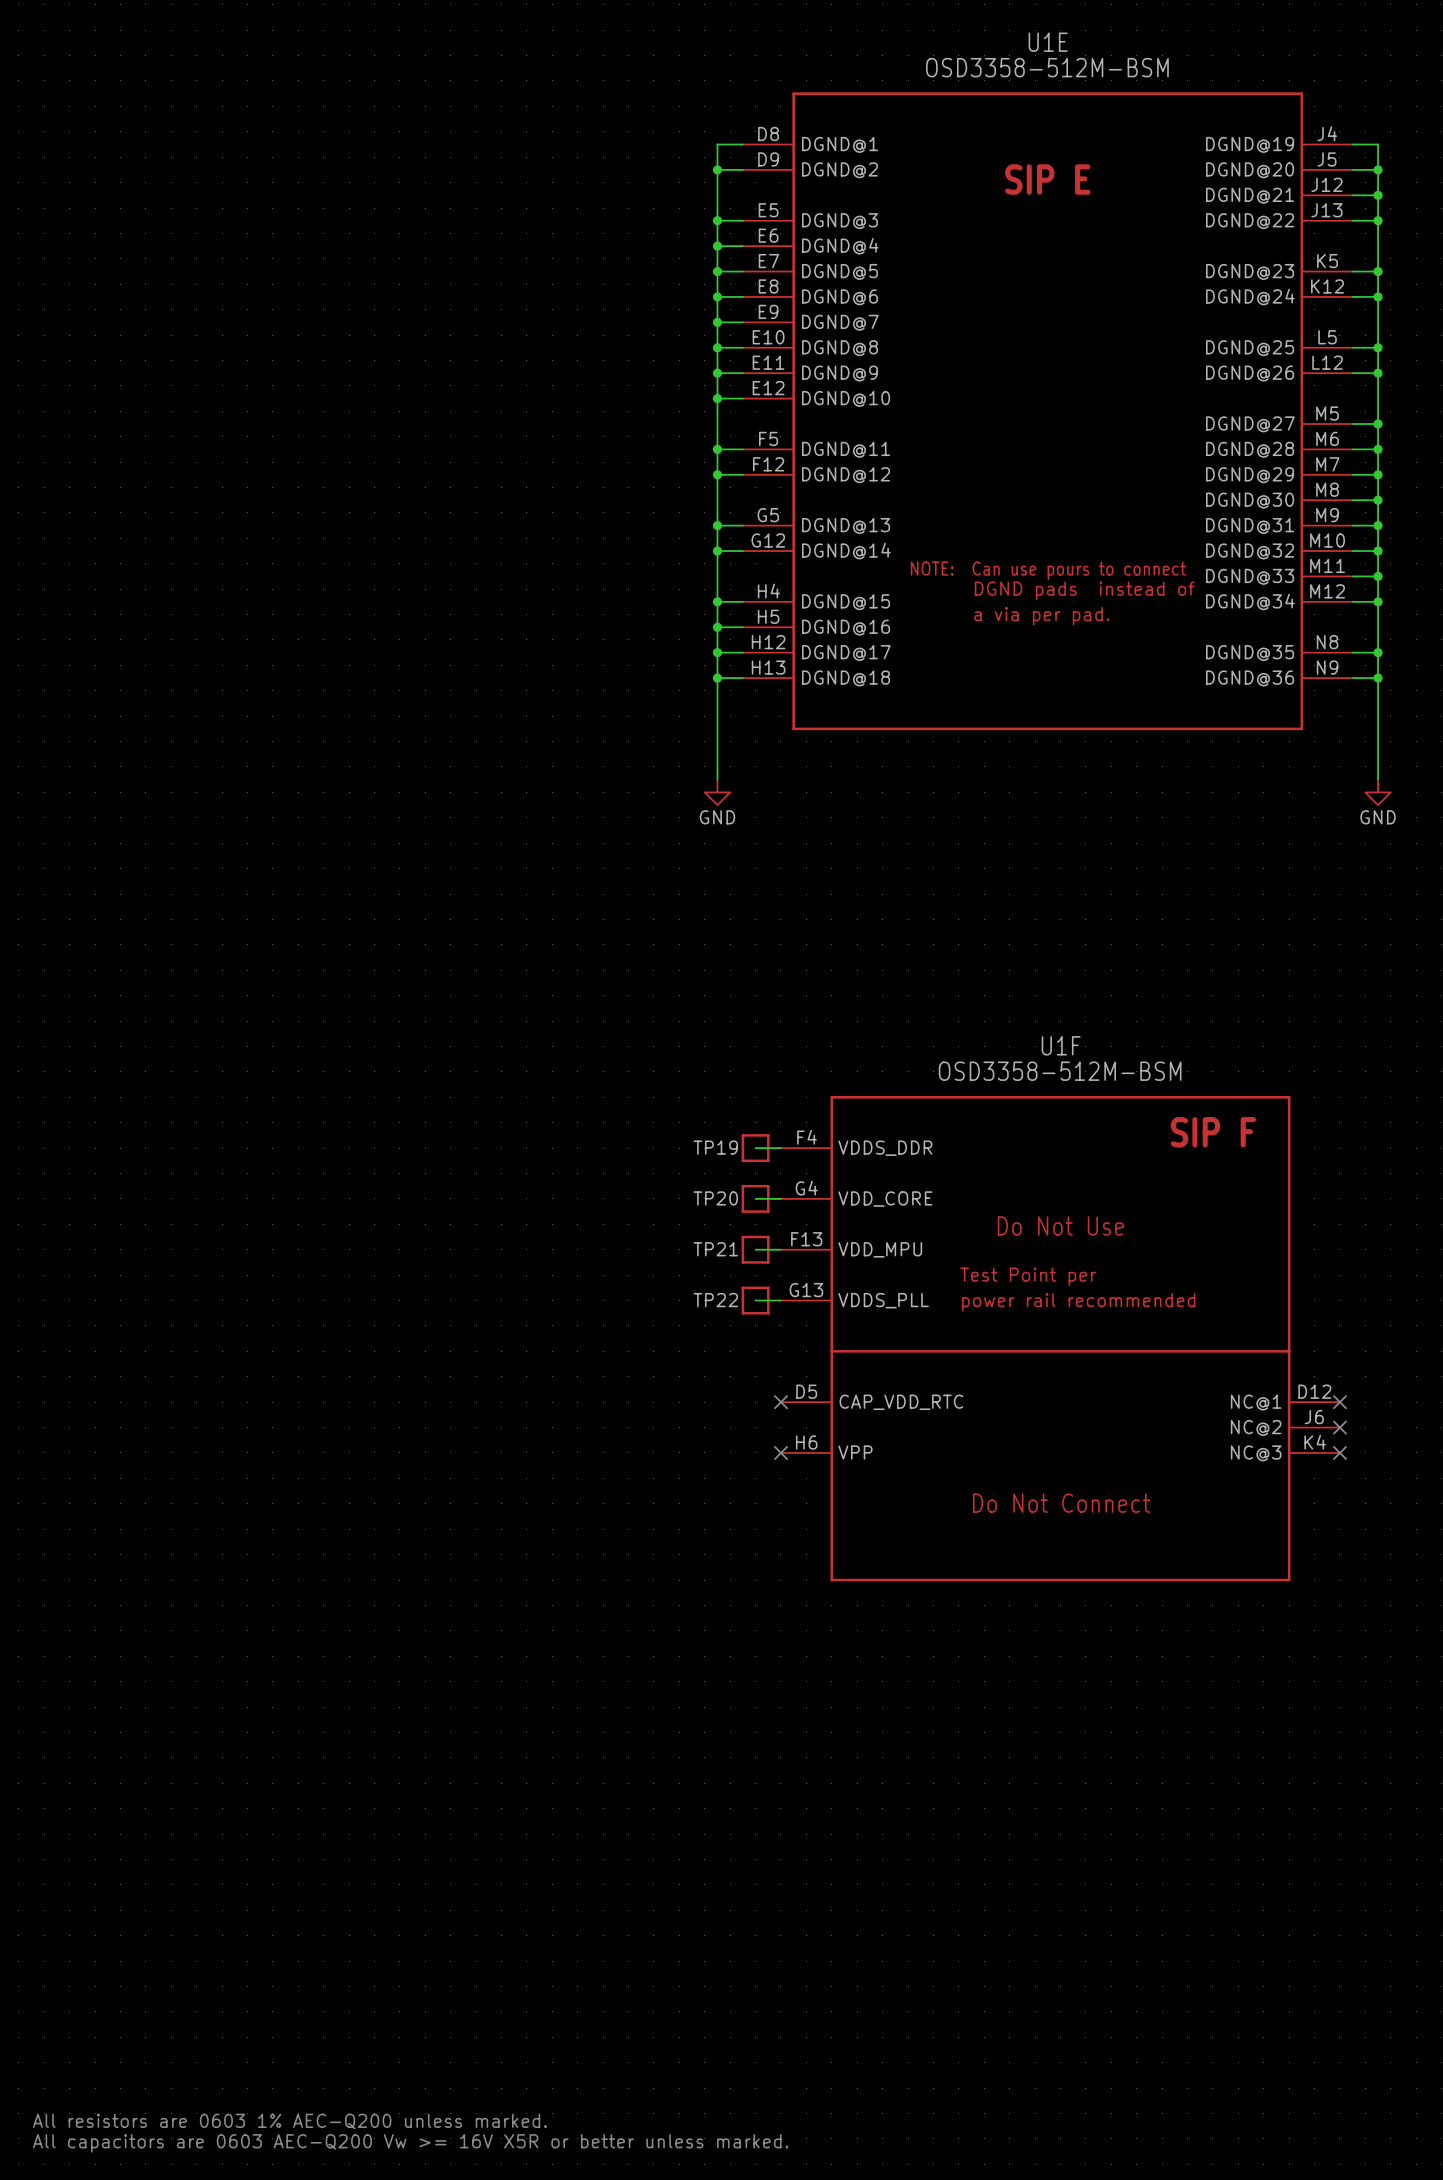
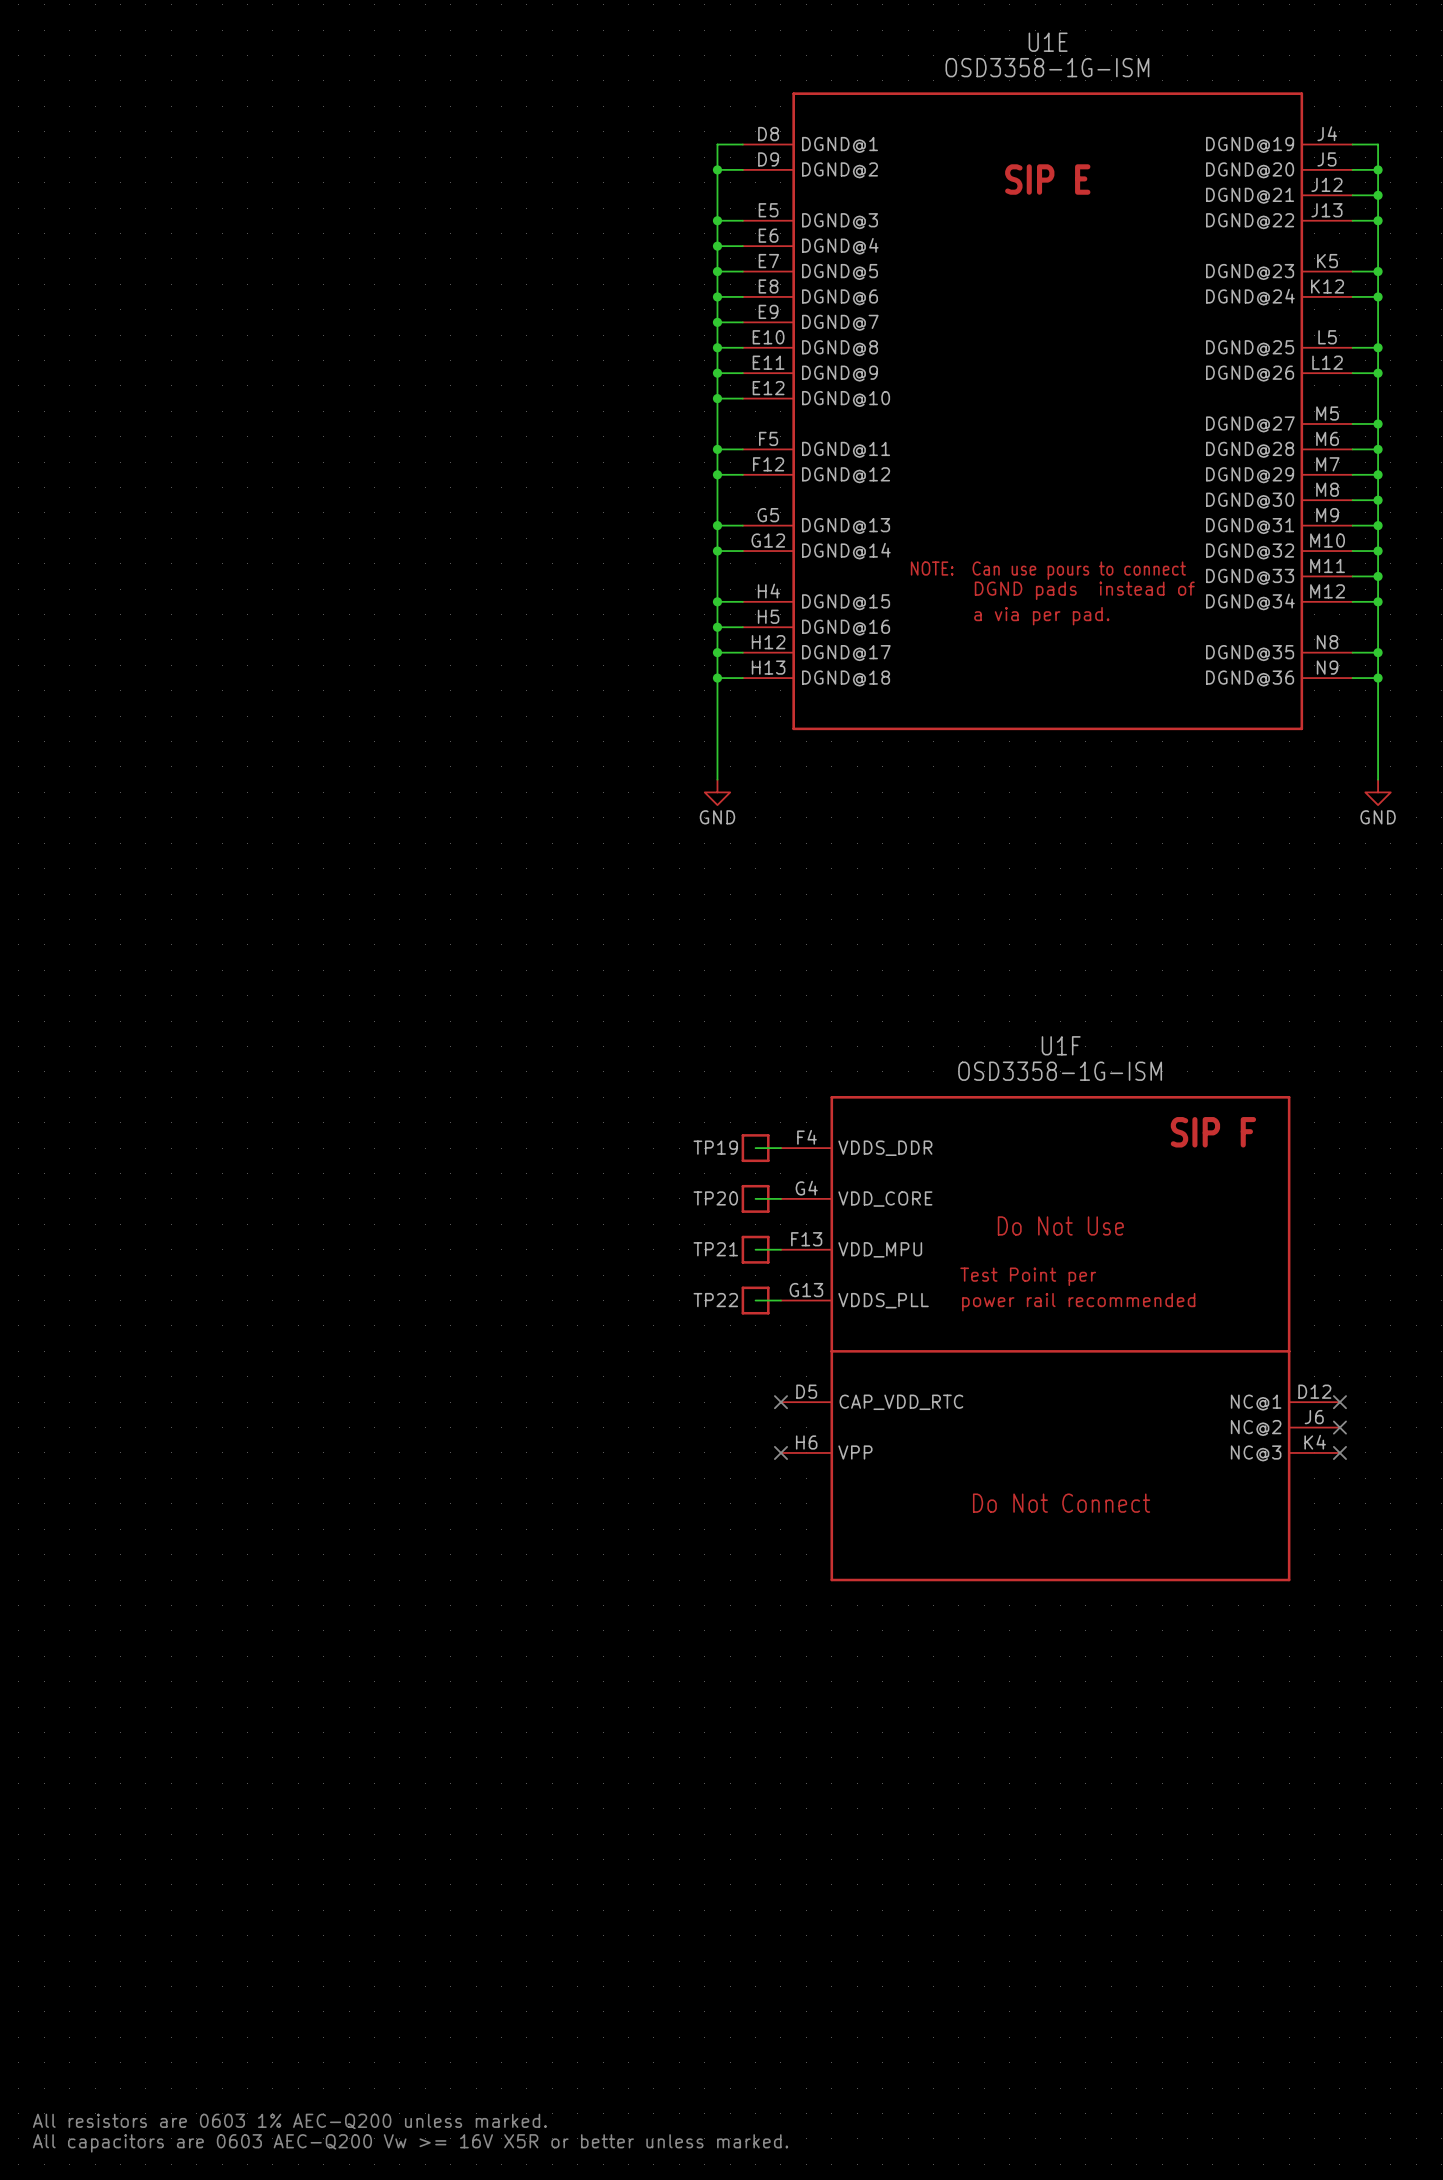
U1E value: OSD3358-512M-BSM (1047, 67) -> OSD3358-1G-ISM (1047, 67)
U1F value: OSD3358-512M-BSM (1060, 1071) -> OSD3358-1G-ISM (1060, 1071)

